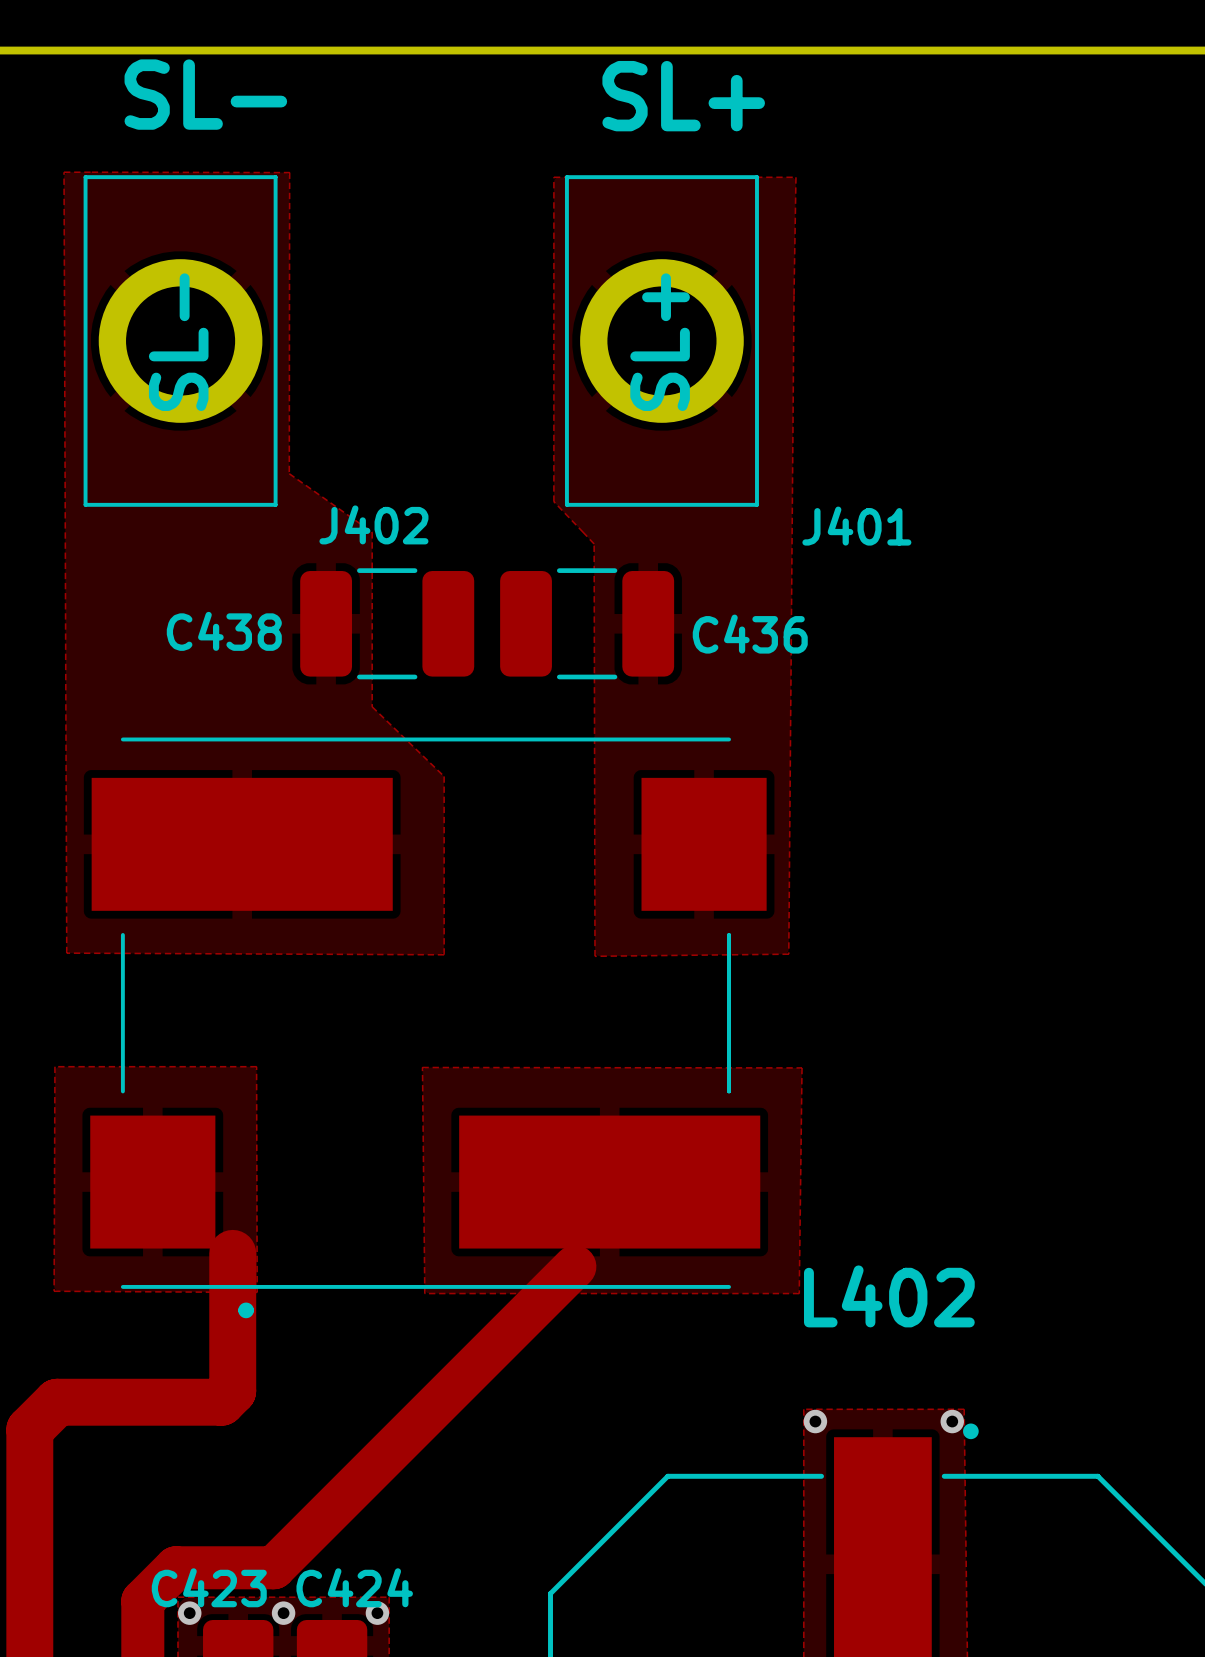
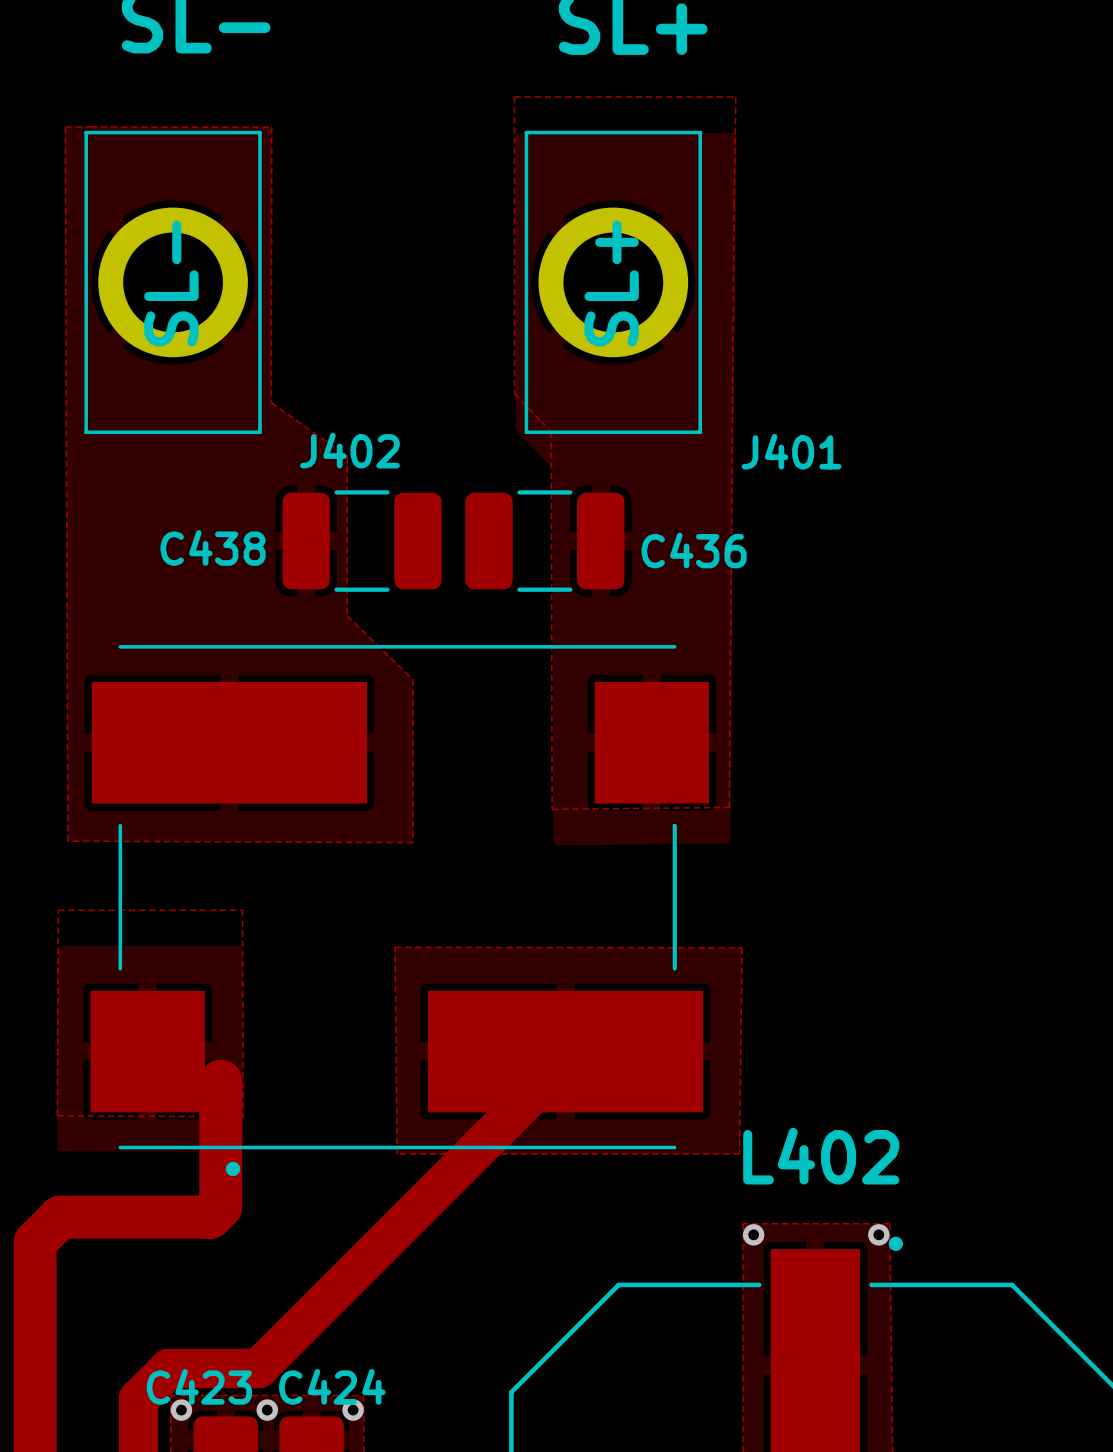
zone outline: (64, 172) (66, 953) (444, 954) (444, 776) (372, 706) (372, 532) (289, 473) (289, 172) (64, 172) -> (65, 126) (67, 841) (412, 842) (412, 679) (347, 615) (347, 456) (271, 402) (271, 127) (65, 126)
J402 position: (180, 340) -> (173, 282)
J401 position: (661, 340) -> (613, 282)
C438 position: (387, 623) -> (362, 541)
C436 position: (587, 623) -> (544, 541)
L402 position: (428, 1027) -> (399, 910)
zone outline: (422, 1067) (424, 1293) (799, 1293) (802, 1067) (422, 1067) -> (395, 947) (397, 1154) (739, 1154) (742, 947) (395, 947)

